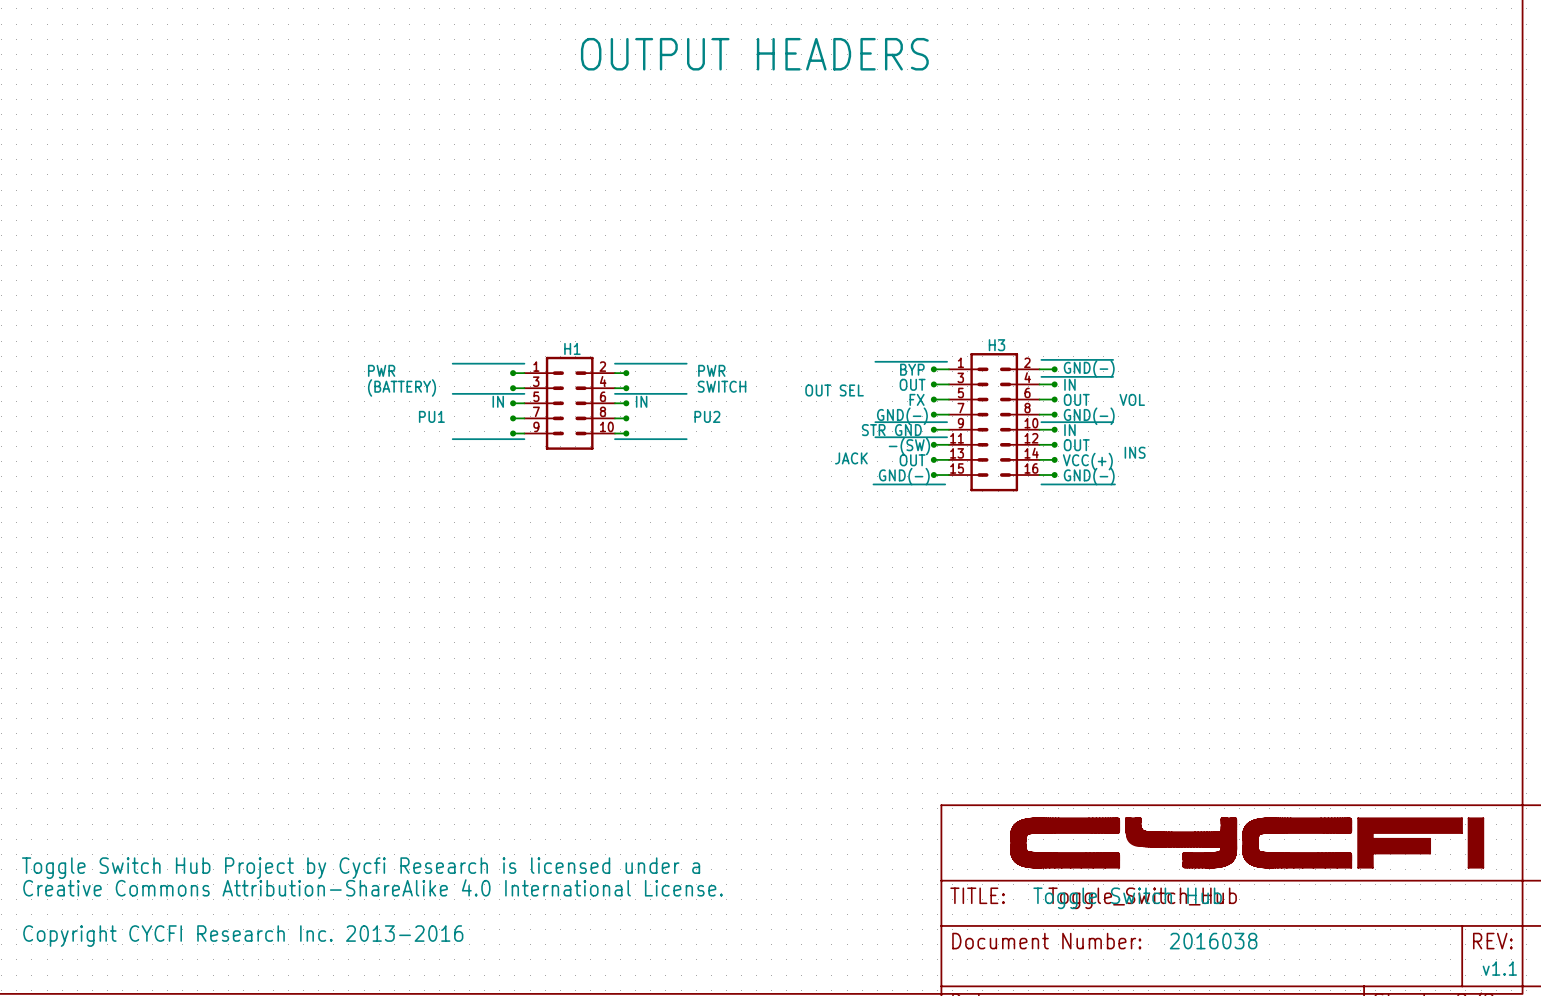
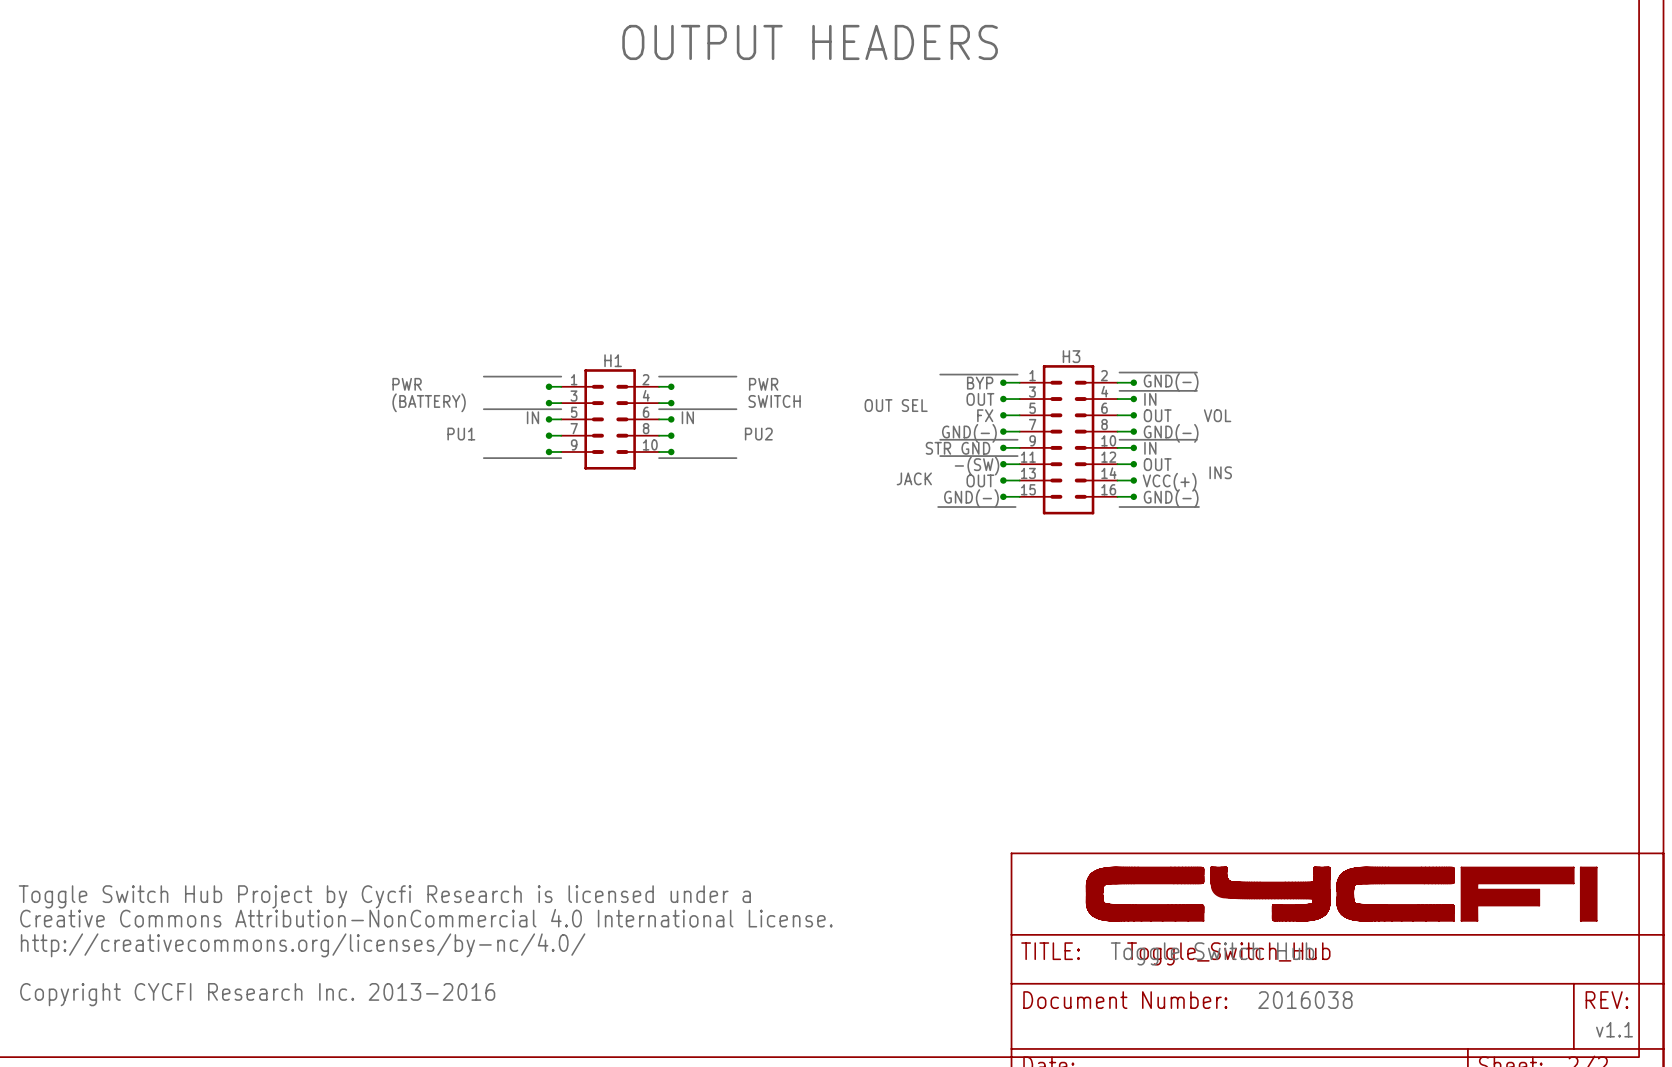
text: none -> Toggle Switch Hub Project by Cycfi Research is licensed under a (384, 896)
text: Toggle Switch Hub Project by Cycfi Research is licensed under a (361, 868) -> Creative Commons Attribution-NonCommercial 4.0 International License. (426, 918)
text: Creative Commons Attribution-ShareAlike 4.0 International License. (373, 887) -> http://creativecommons.org/licenses/by-nc/4.0/ (303, 945)

